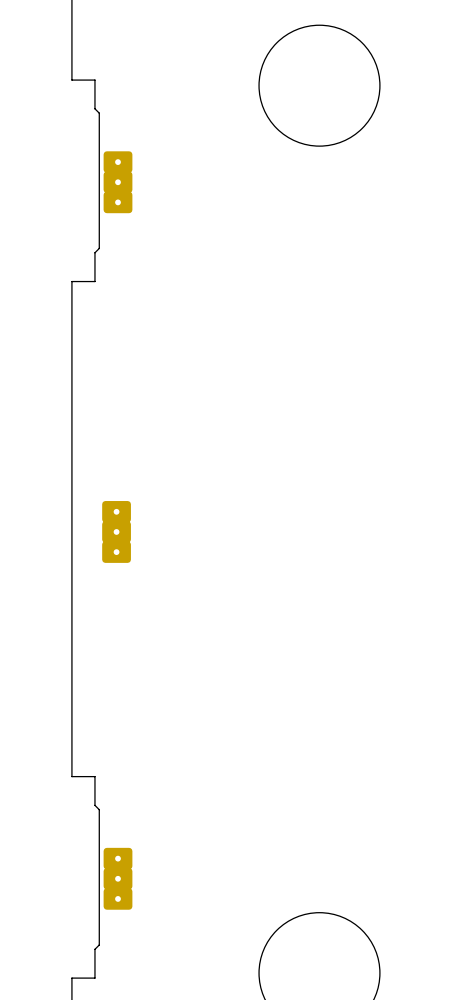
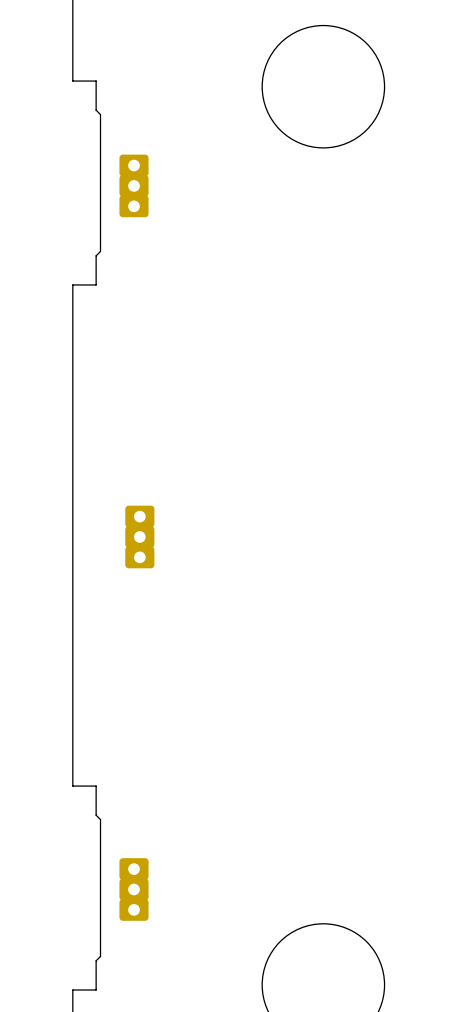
part: (118, 182) -> none
part: none -> (134, 185)
part: none -> (139, 536)
part: (116, 531) -> none
part footprint: [103, 847, 133, 910] -> [119, 858, 149, 921]

